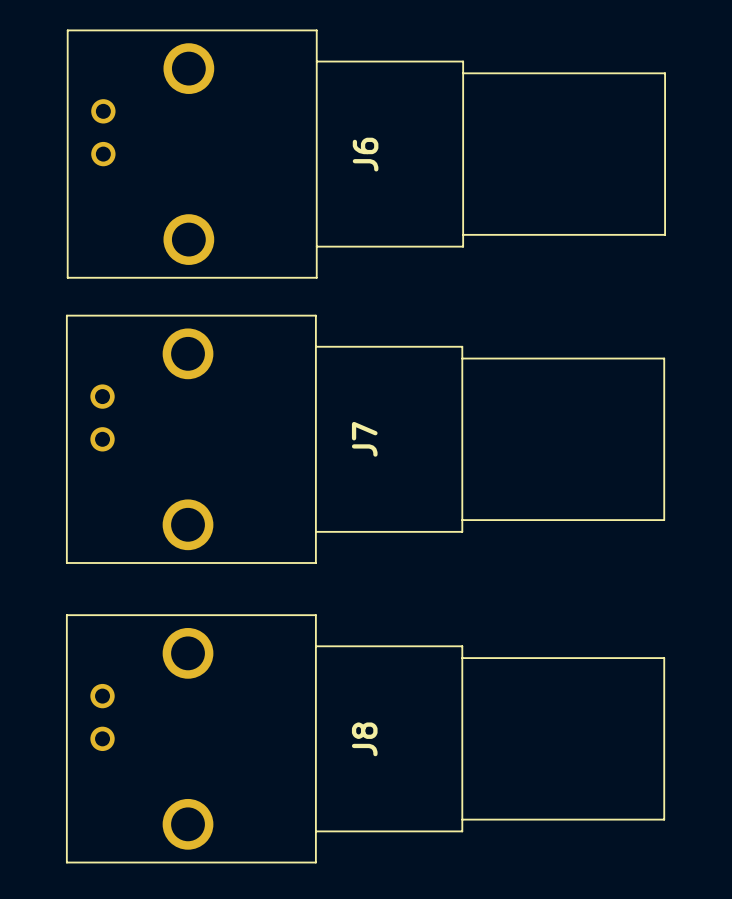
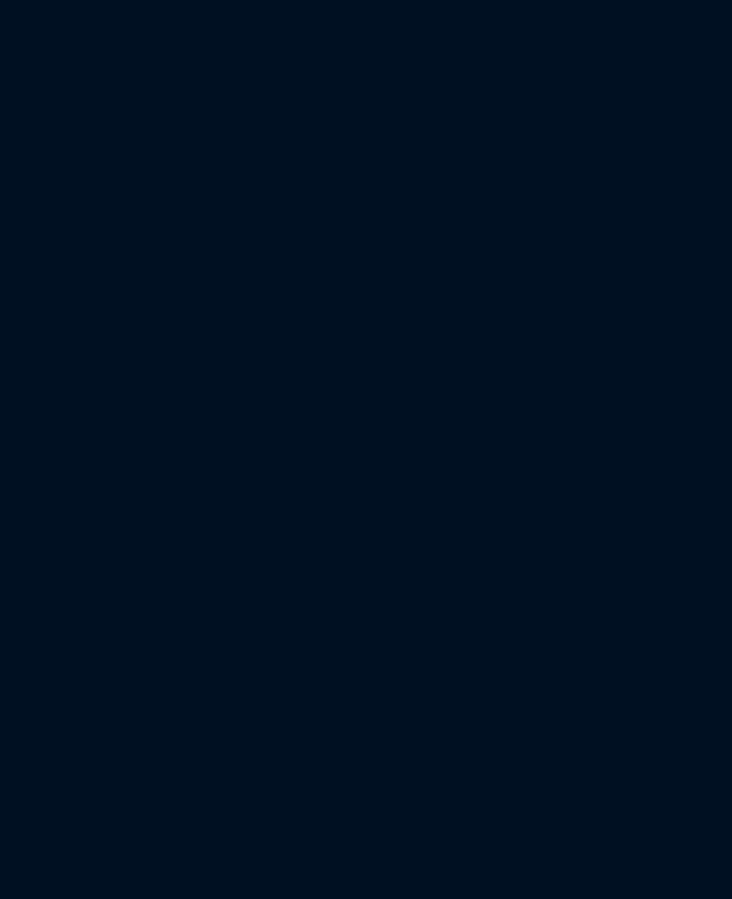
J6: (366, 154) -> none
J7: (365, 439) -> none
J8: (365, 738) -> none

